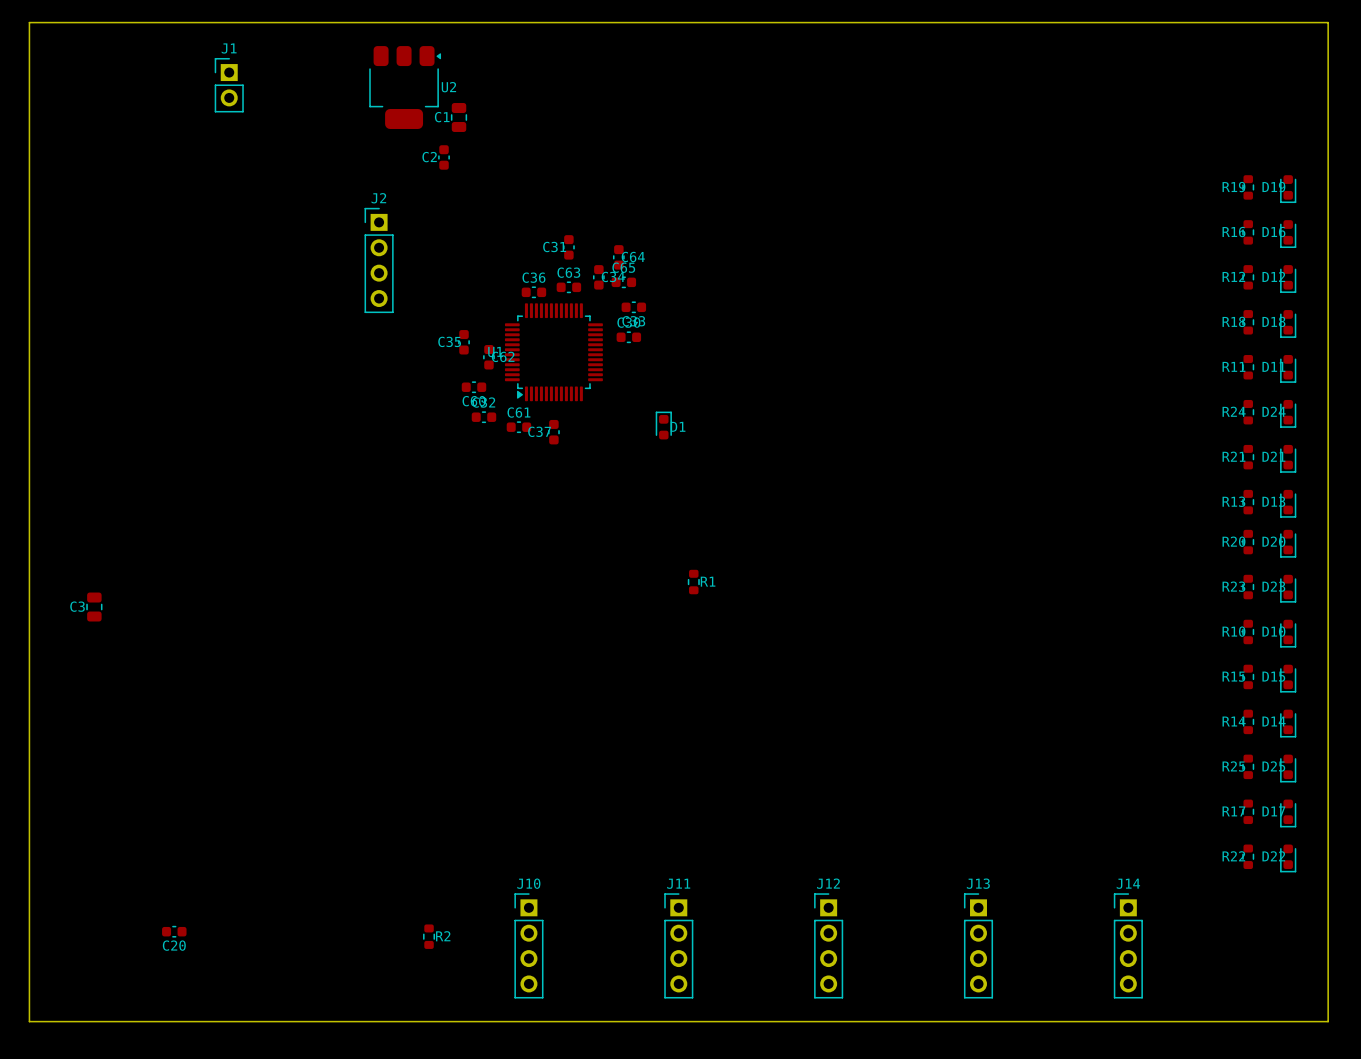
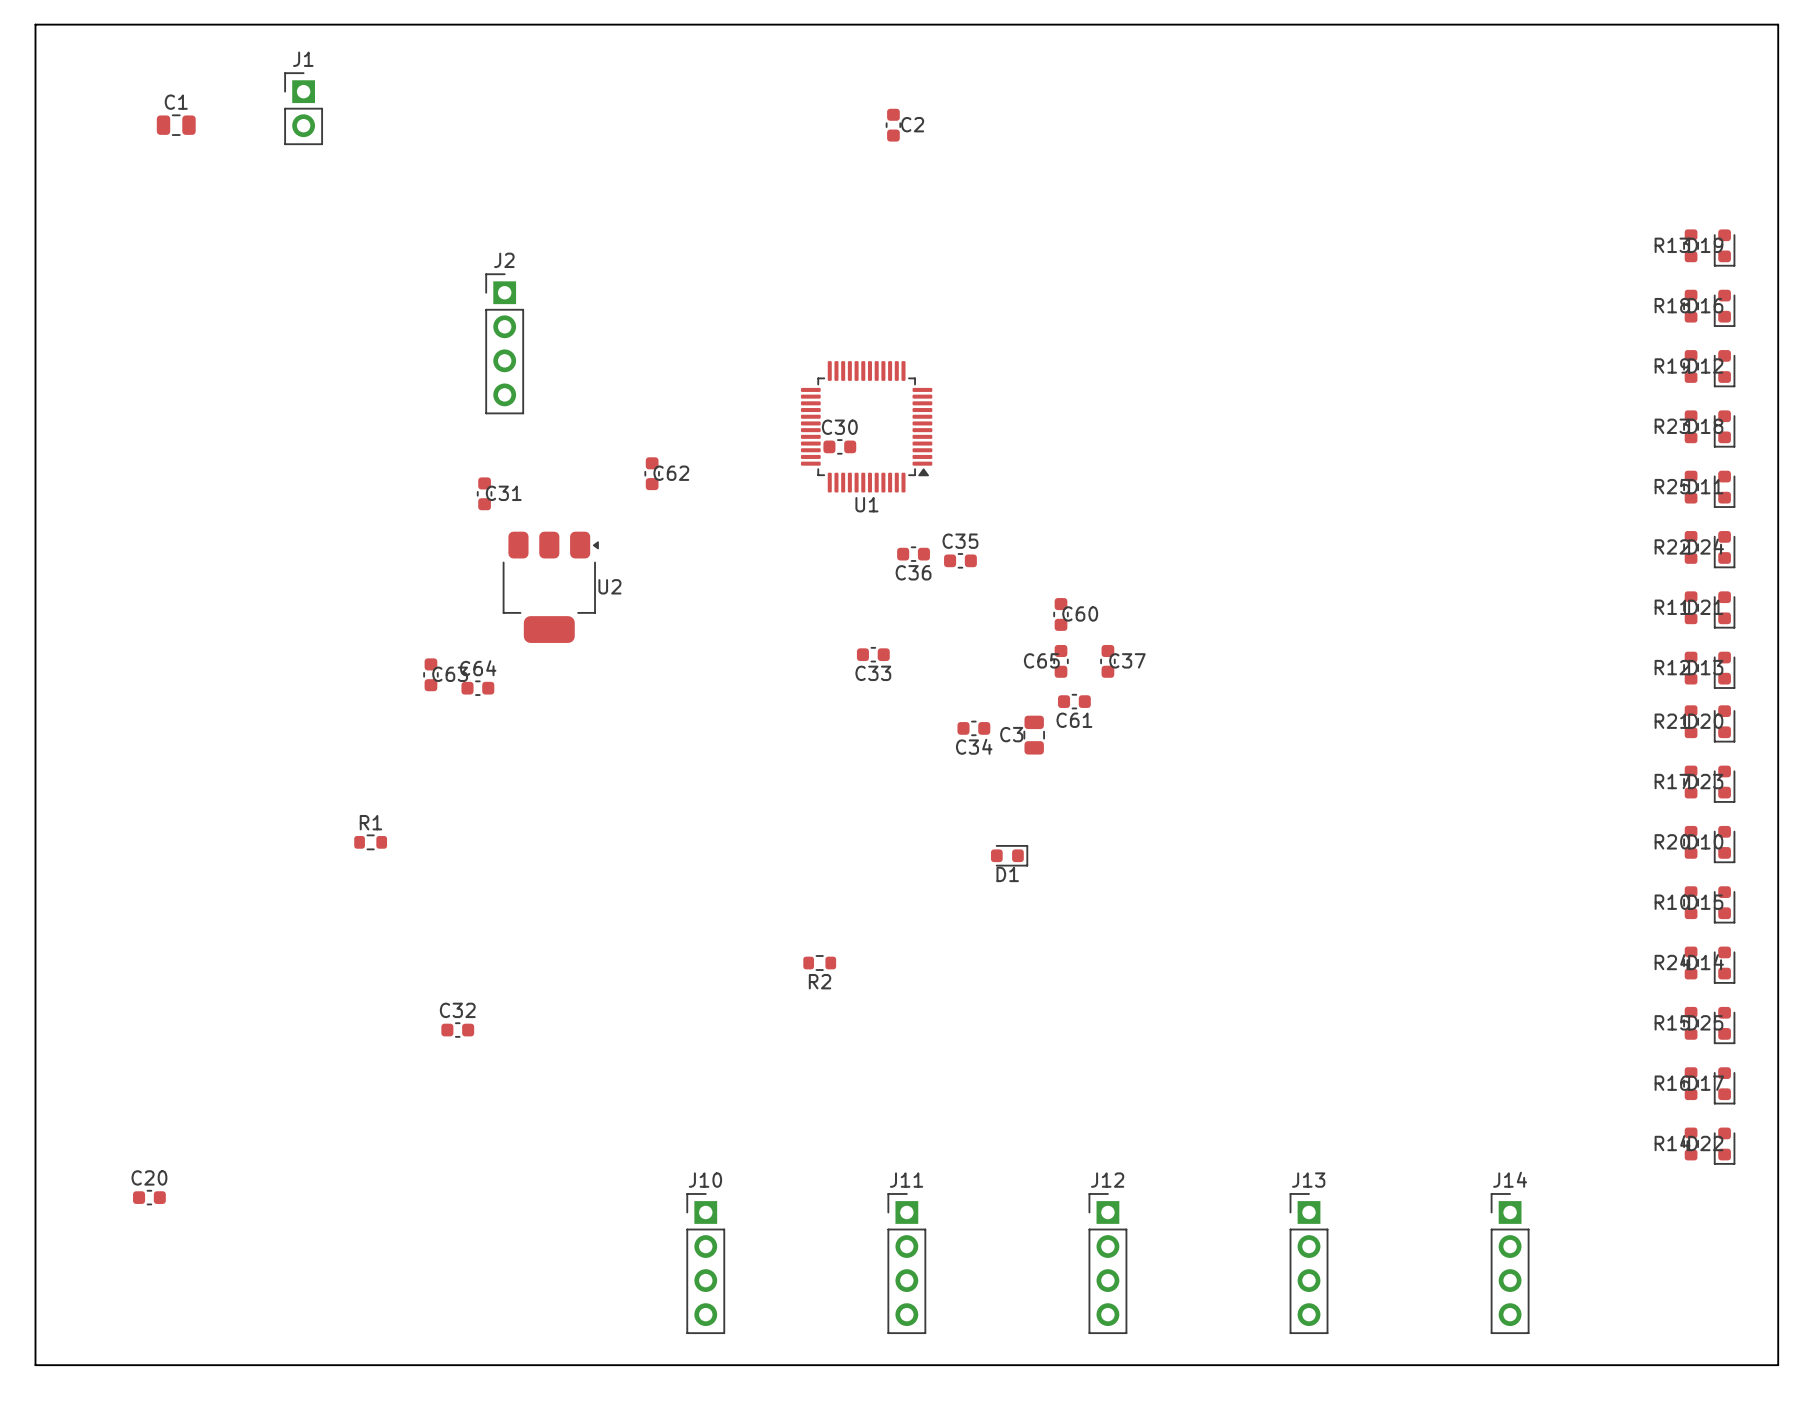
U2 position: (405, 87) -> (550, 587)
C1 rotation: 0° (459, 117) -> 90° clockwise (176, 125)
C1 position: (459, 117) -> (176, 125)
C2 name position: C2 (429, 157) -> C2 (912, 124)
C2 position: (444, 157) -> (893, 125)
R19 position: (1248, 187) -> (1691, 366)
R16 position: (1248, 232) -> (1691, 1083)
C31 name position: C31 (554, 247) -> C31 (503, 493)
C31 position: (568, 247) -> (484, 493)
C64 name position: C64 (633, 256) -> C64 (478, 668)
C64 rotation: 0° (618, 257) -> 90° clockwise (477, 688)
C64 position: (618, 257) -> (477, 688)
C65 name position: C65 (623, 267) -> C65 (1041, 660)
C36 name position: C36 (533, 277) -> C36 (913, 572)
C34 rotation: 0° (598, 277) -> 90° clockwise (973, 728)
C34 position: (598, 277) -> (973, 728)
R12 position: (1248, 277) -> (1691, 668)
C65 rotation: 0° (623, 282) -> 90° clockwise (1061, 661)
C65 position: (623, 282) -> (1061, 661)
C63 rotation: 0° (568, 287) -> 90° clockwise (430, 674)
C63 position: (568, 287) -> (430, 674)
C36 position: (533, 292) -> (913, 554)
C33 position: (633, 307) -> (873, 654)
R18 position: (1248, 322) -> (1691, 306)
C35 rotation: 0° (464, 342) -> 90° clockwise (960, 560)
C35 position: (464, 342) -> (960, 560)
U1 rotation: 0° (553, 352) -> 90° counterclockwise (866, 426)
U1 position: (553, 352) -> (866, 426)
R11 position: (1248, 367) -> (1691, 607)
C60 rotation: 0° (473, 387) -> 90° clockwise (1061, 614)
C60 position: (473, 387) -> (1061, 614)
C60 name position: C60 (474, 401) -> C60 (1080, 613)
C61 name position: C61 (518, 412) -> C61 (1074, 720)
R24 position: (1248, 412) -> (1691, 963)
C32 position: (483, 417) -> (457, 1030)
D1 rotation: 0° (663, 425) -> 90° clockwise (1009, 855)
D1 position: (663, 425) -> (1009, 855)
C61 position: (518, 427) -> (1074, 701)
C37 name position: C37 (539, 431) -> C37 (1127, 660)
C37 position: (553, 432) -> (1107, 661)
R21 position: (1248, 457) -> (1691, 721)
R13 position: (1248, 502) -> (1691, 245)
R20 position: (1248, 542) -> (1691, 842)
R1 name position: R1 (708, 581) -> R1 (370, 822)
R1 rotation: 0° (693, 582) -> 90° clockwise (370, 842)
R1 position: (693, 582) -> (370, 842)
R23 position: (1248, 587) -> (1691, 426)
C3 position: (94, 607) -> (1034, 735)
R10 position: (1248, 631) -> (1691, 902)
R15 position: (1248, 676) -> (1691, 1023)
R14 position: (1248, 721) -> (1691, 1143)
R25 position: (1248, 766) -> (1691, 487)
R17 position: (1248, 811) -> (1691, 782)
R22 position: (1248, 856) -> (1691, 547)
C20 position: (174, 931) -> (149, 1197)
R2 rotation: 0° (429, 936) -> 90° clockwise (819, 963)
R2 position: (429, 936) -> (819, 963)
C20 name position: C20 (174, 945) -> C20 (149, 1177)

